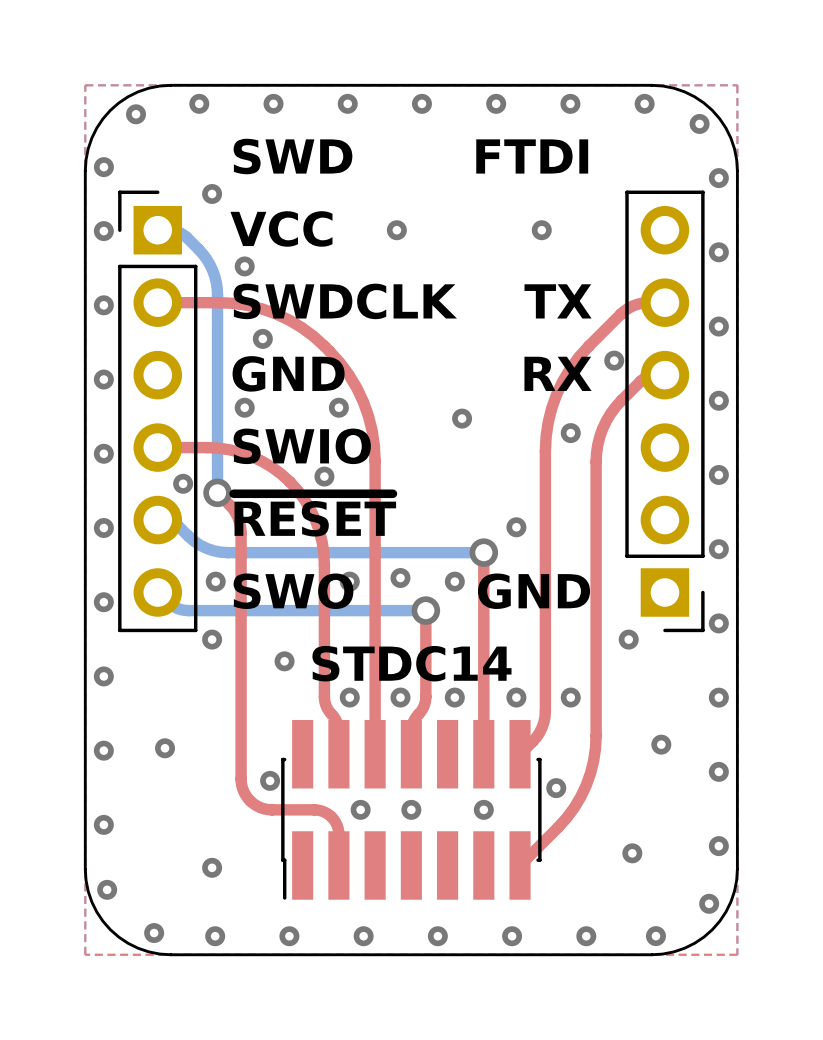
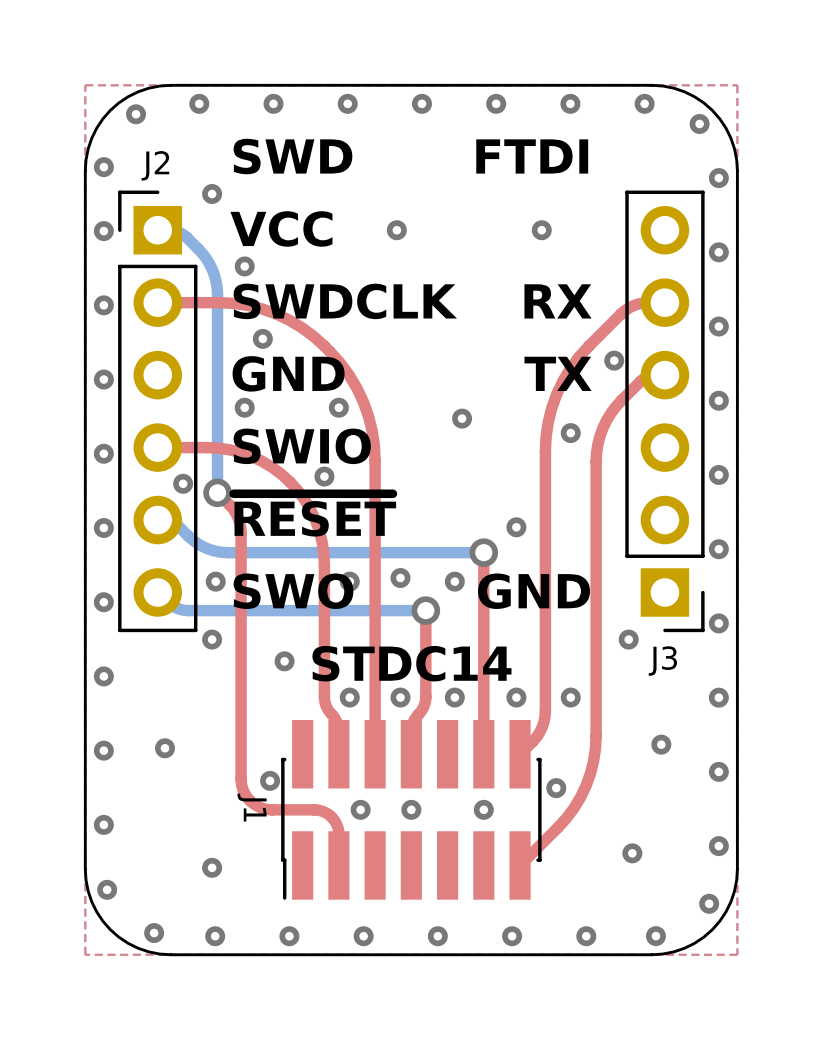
J2 name: none -> J2 (155, 165)
text: TX (558, 301) -> RX (558, 301)
text: RX (558, 373) -> TX (558, 373)
J3 name: none -> J3 (662, 661)
J1 name: none -> J1 (252, 807)

